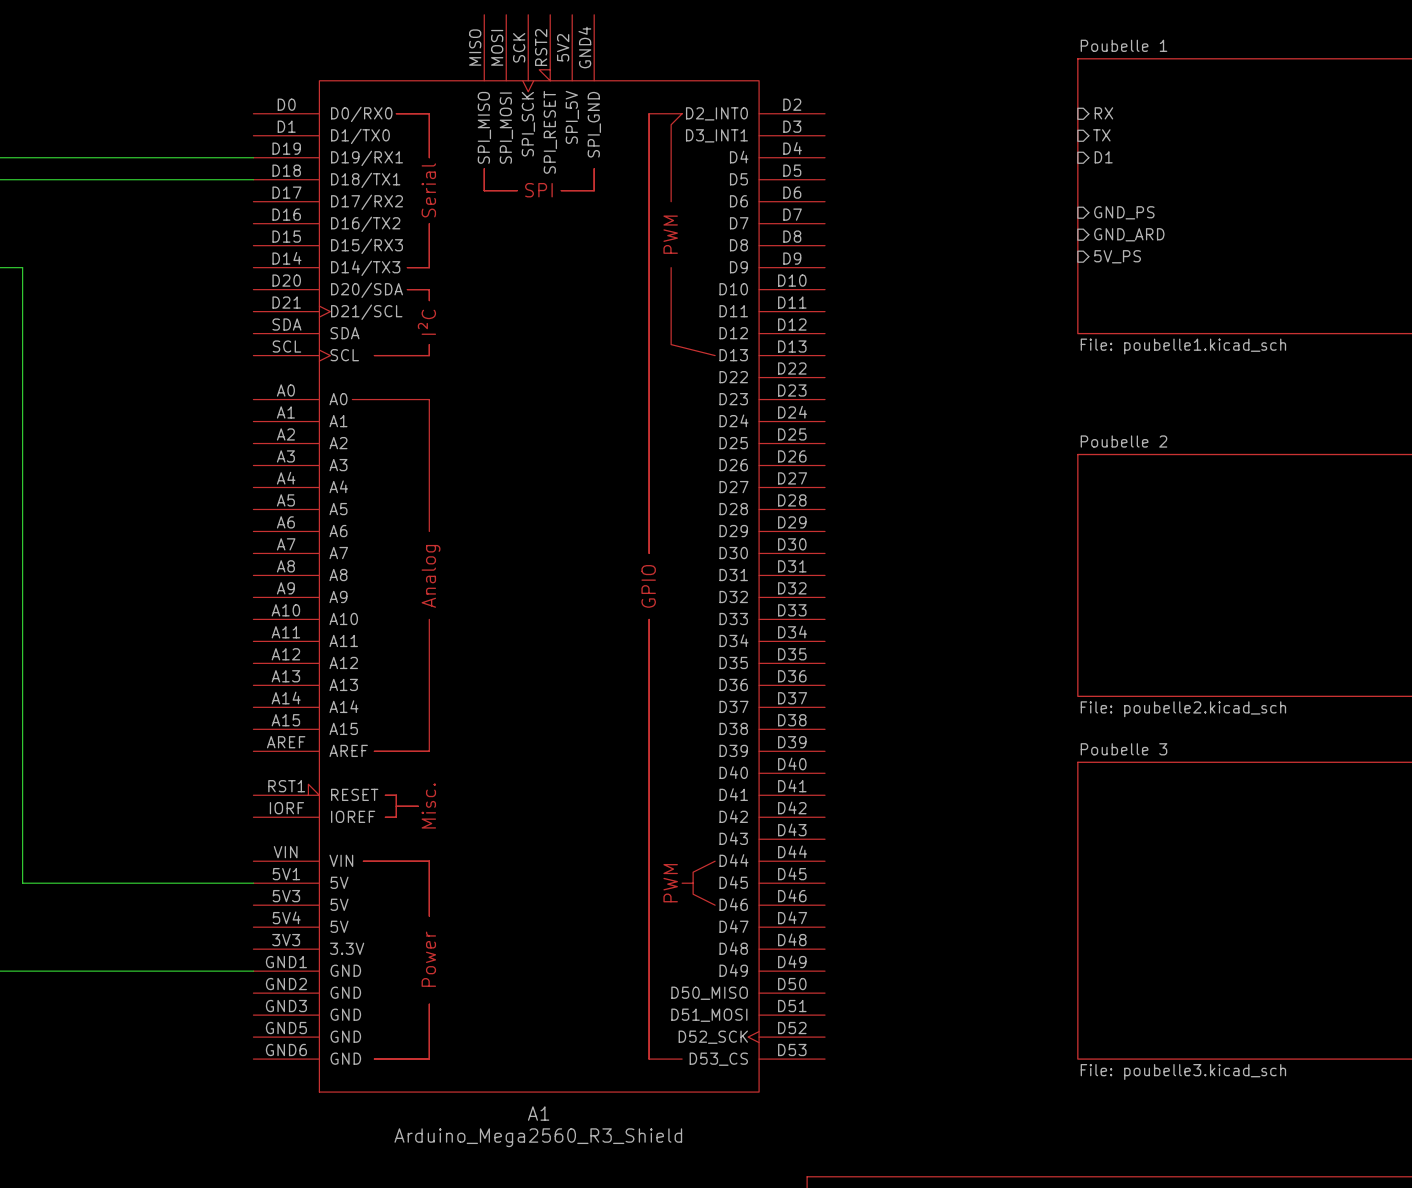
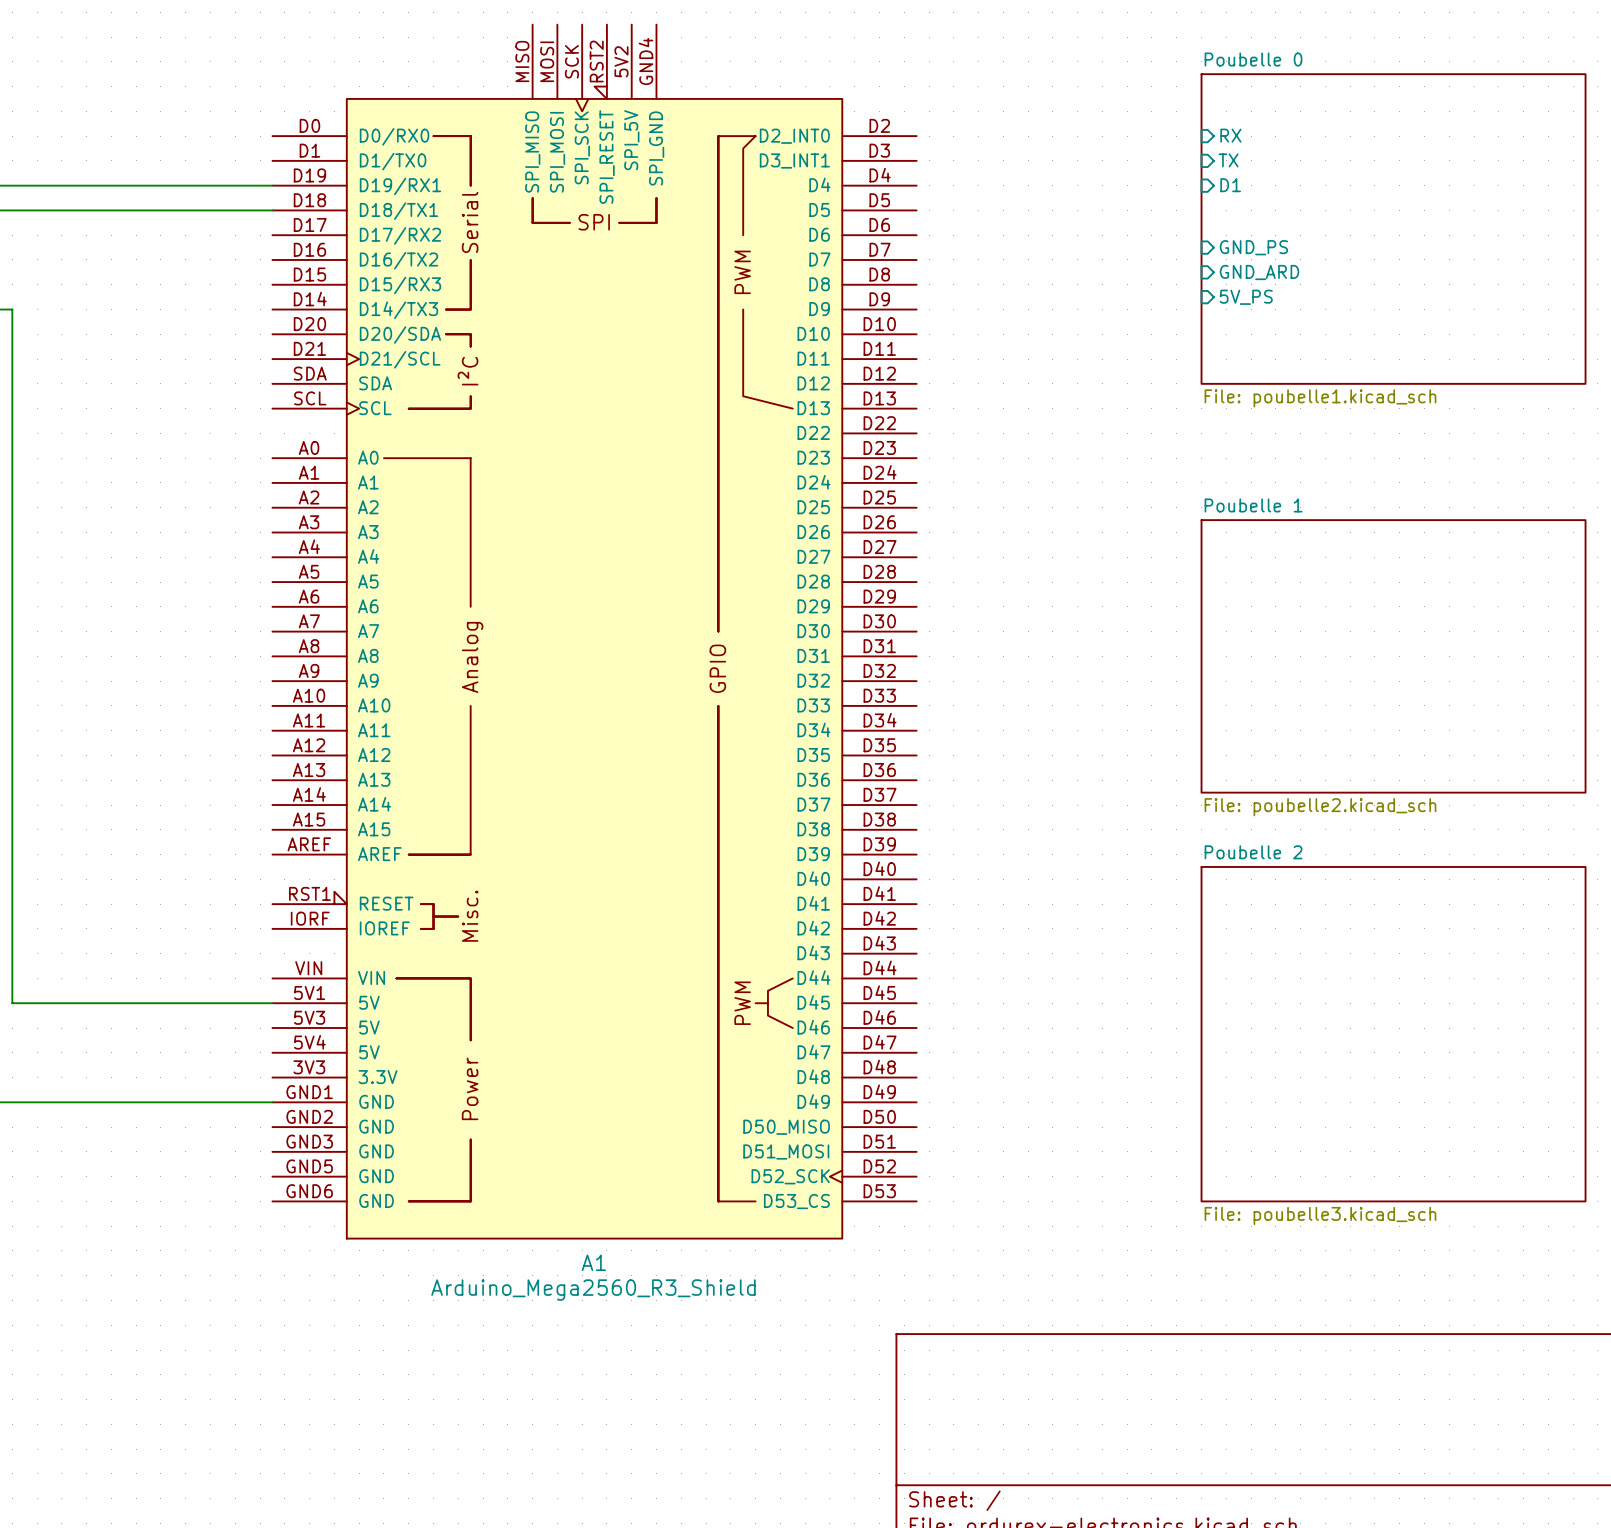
sheet Poubelle 1 name: Poubelle 1 (1123, 45) -> Poubelle 0 (1253, 59)
sheet Poubelle 2 name: Poubelle 2 (1123, 441) -> Poubelle 1 (1253, 505)
sheet Poubelle 3 name: Poubelle 3 (1123, 749) -> Poubelle 2 (1253, 852)

